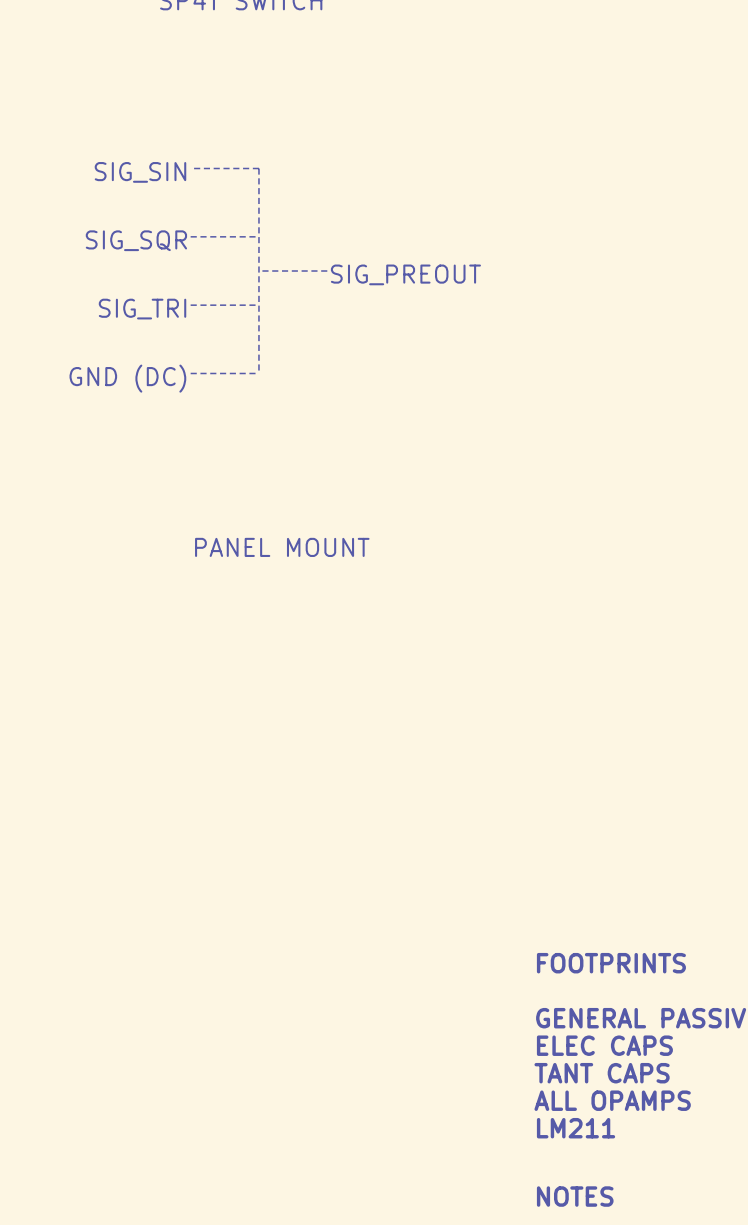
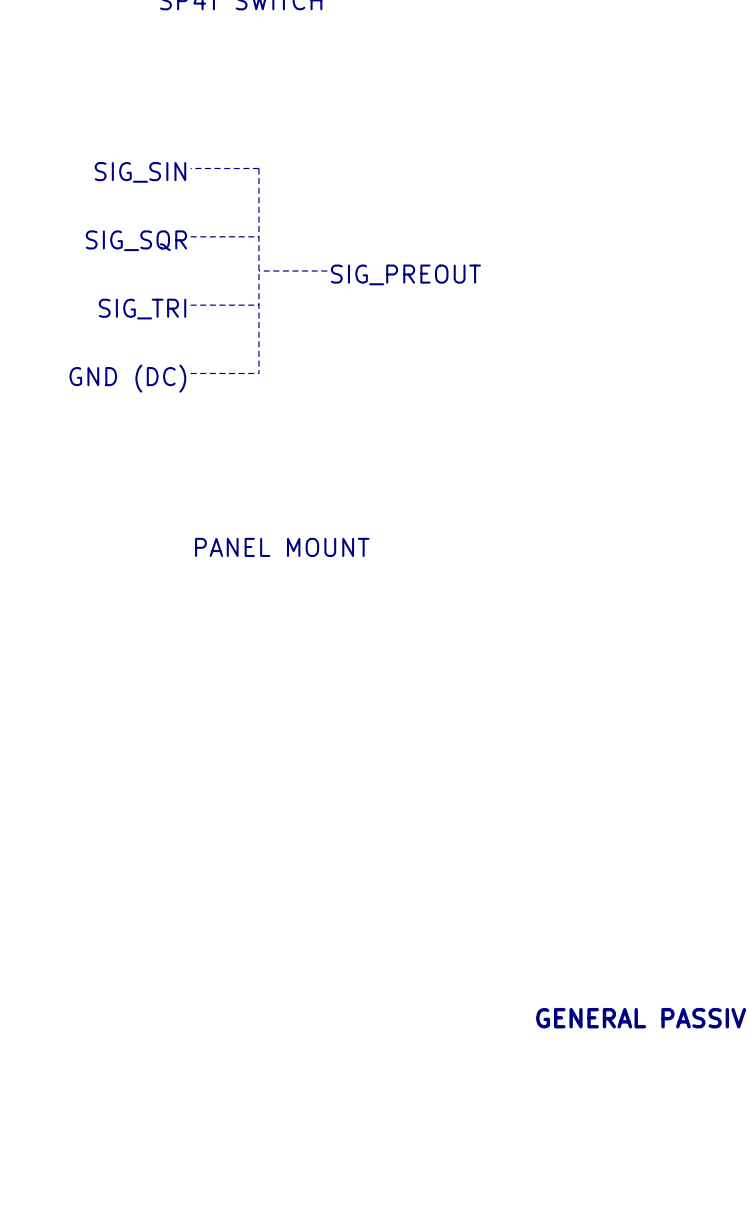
text: FOOTPRINTS (611, 963) -> none
text: ELEC CAPS (604, 1045) -> none
text: TANT CAPS (602, 1073) -> none
text: ALL OPAMPS (612, 1100) -> none
text: LM211 (576, 1128) -> none
text: NOTES (575, 1196) -> none

